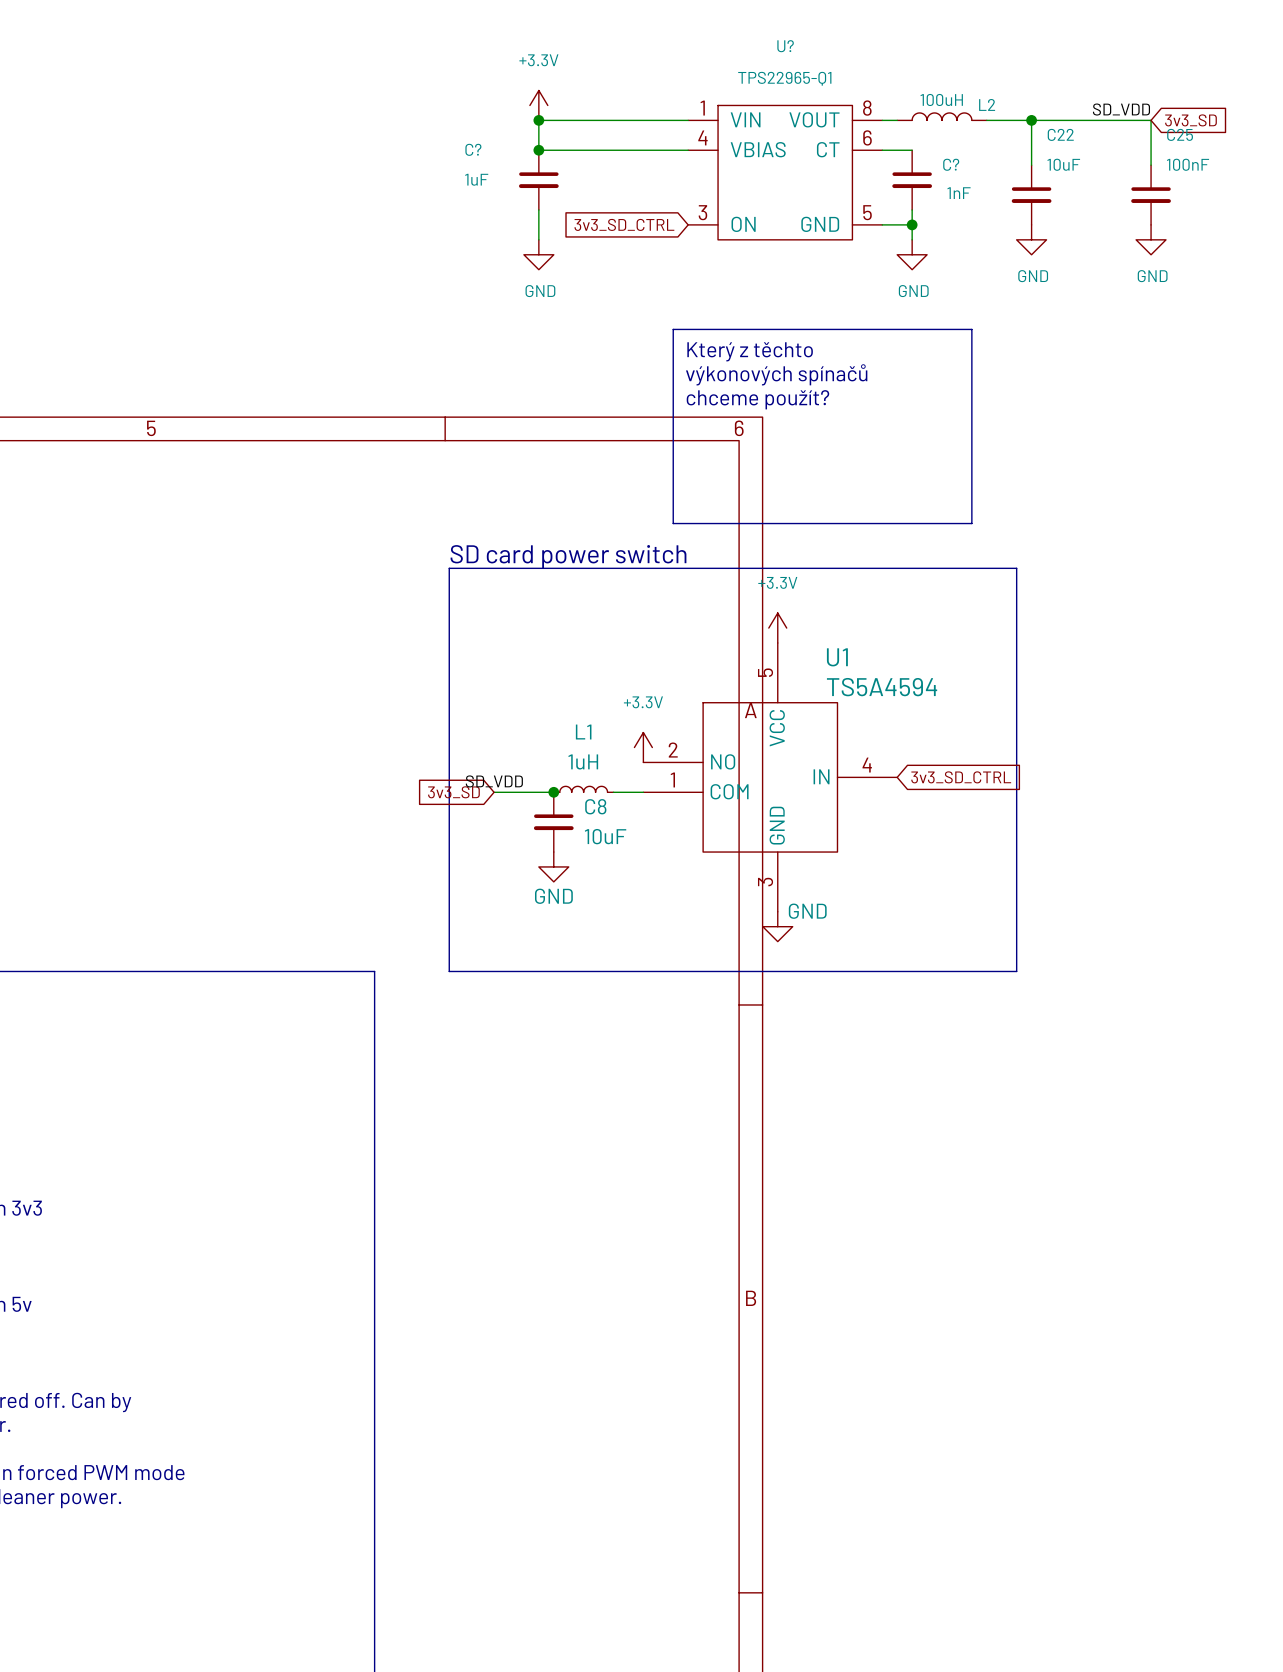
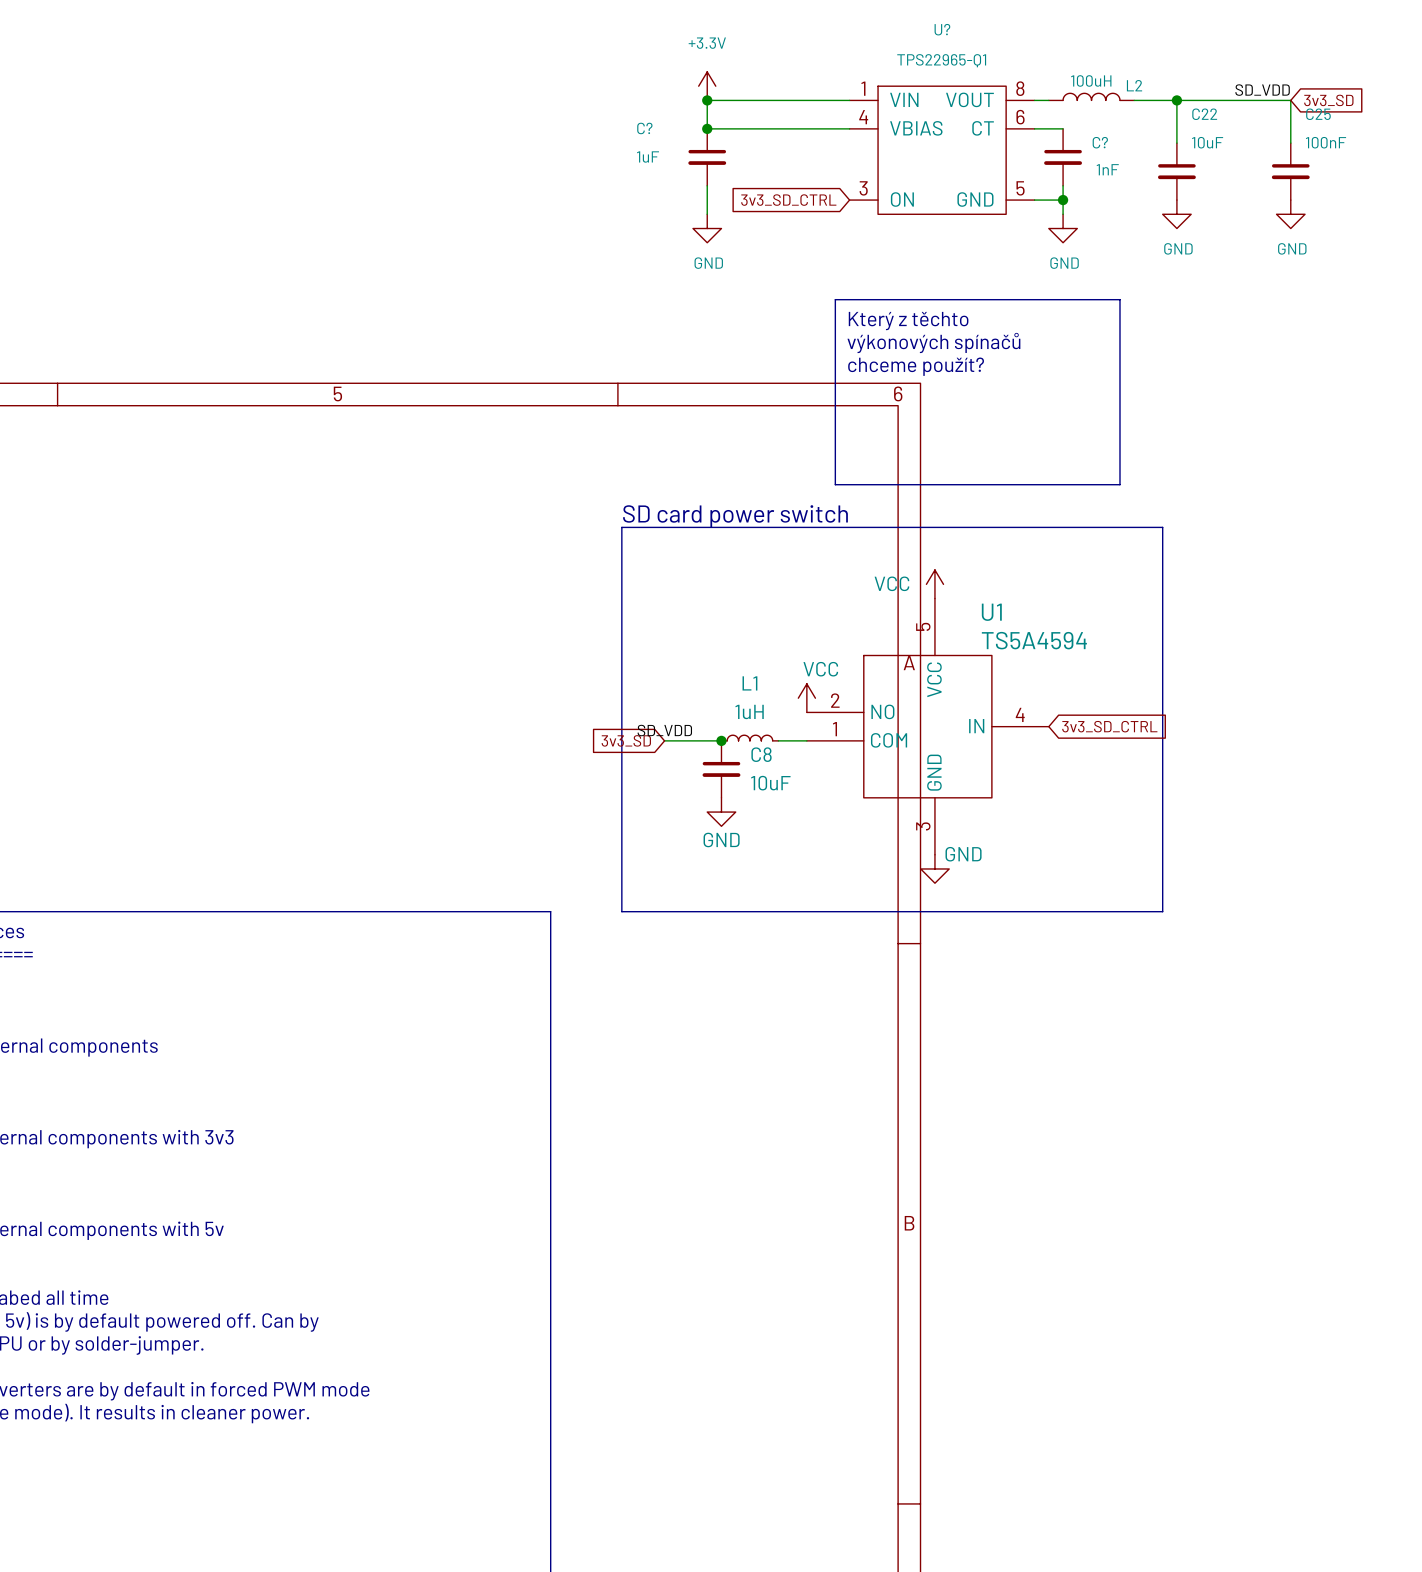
power symbol: +3.3V (777, 628) -> VCC (934, 584)
power symbol: +3.3V (643, 747) -> VCC (806, 698)

